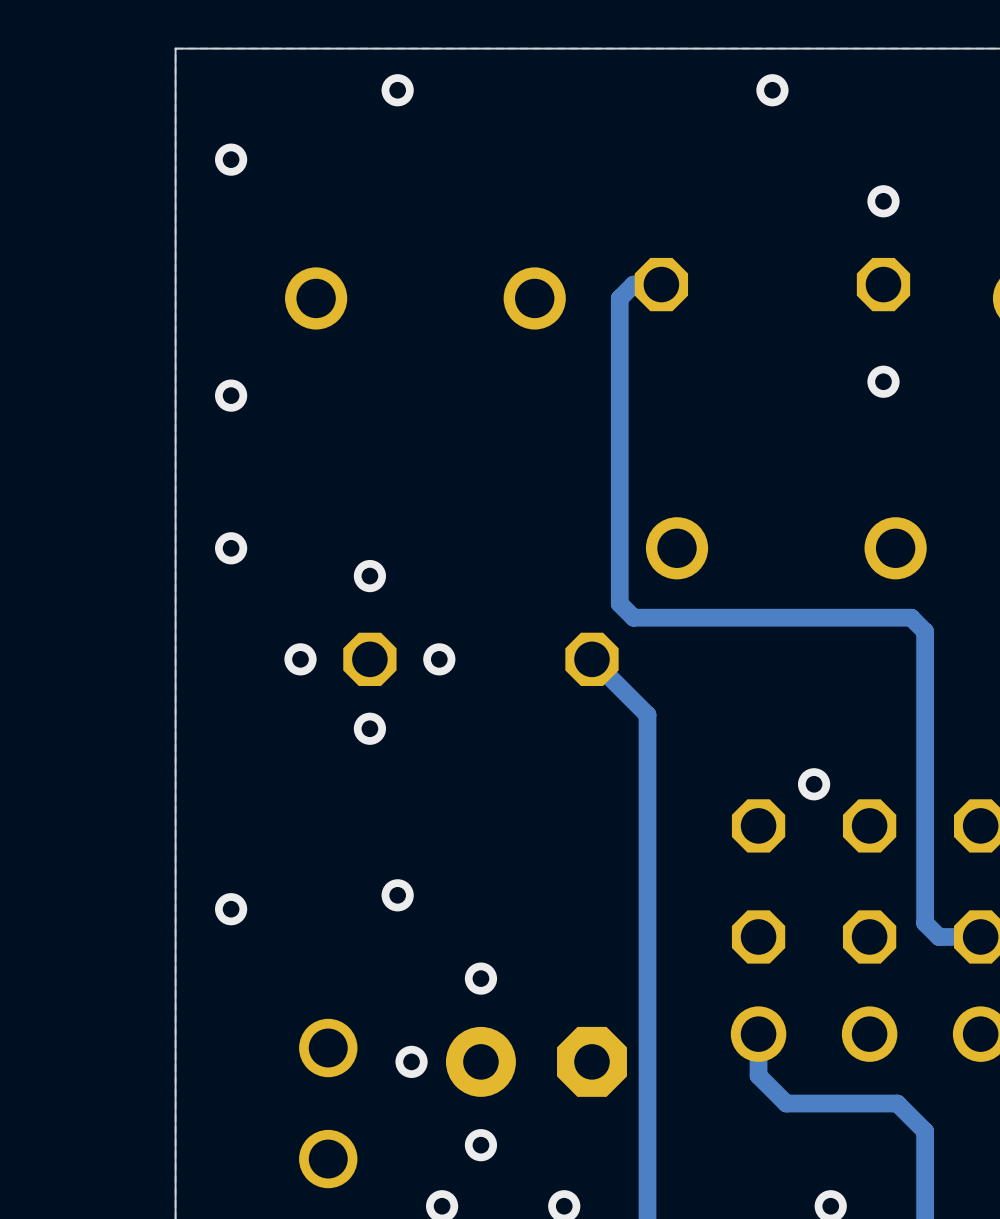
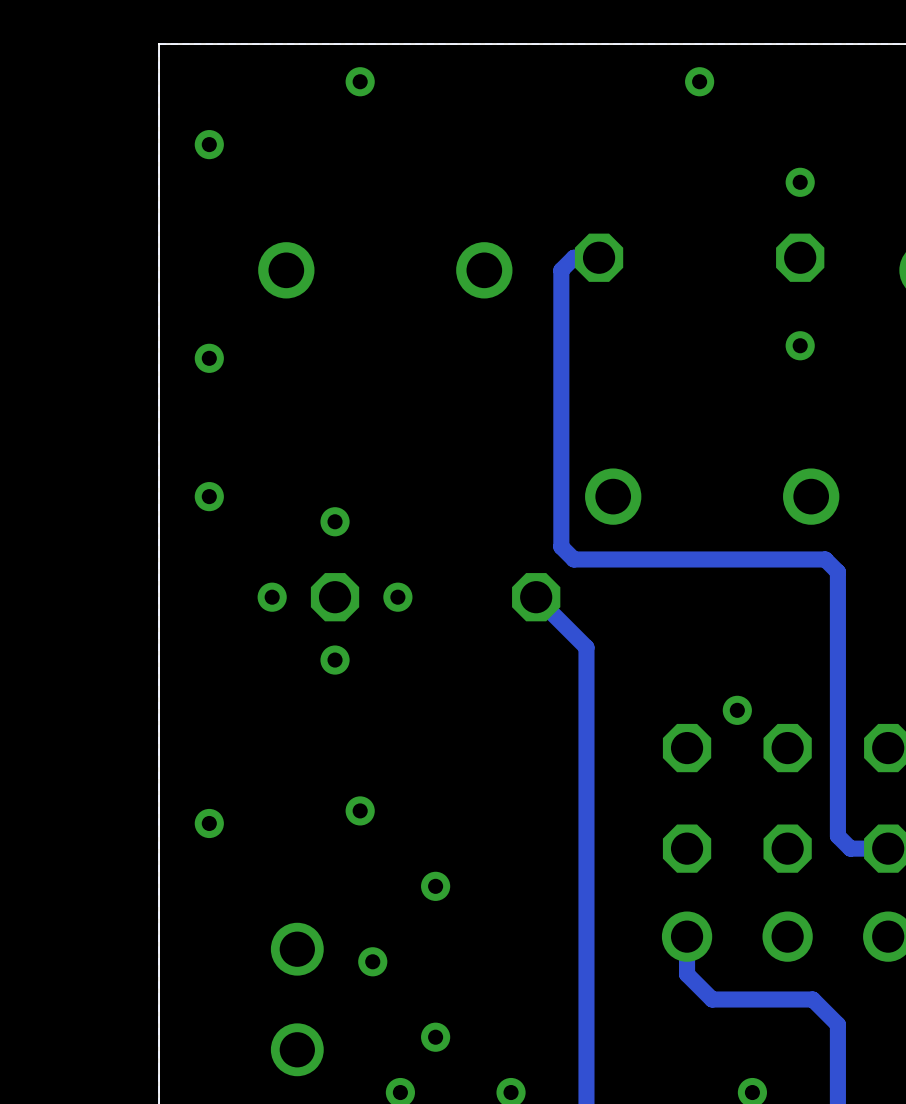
part: (536, 1061) -> none

